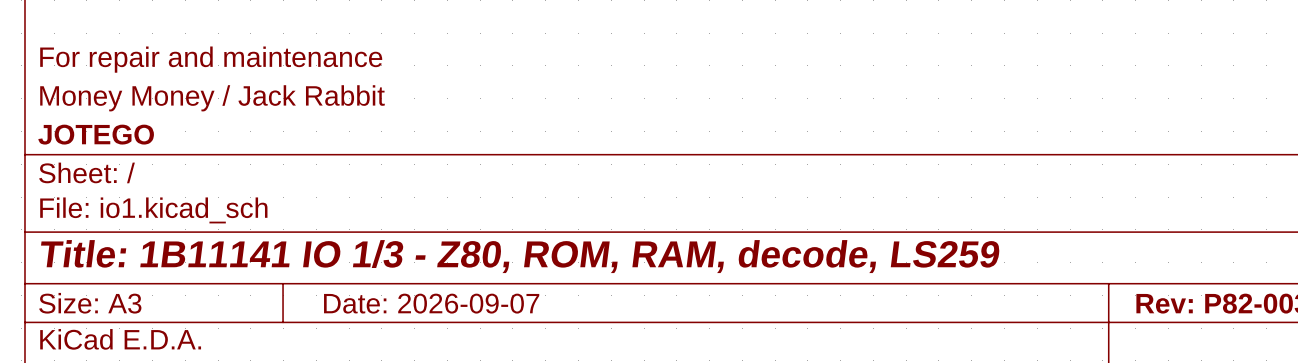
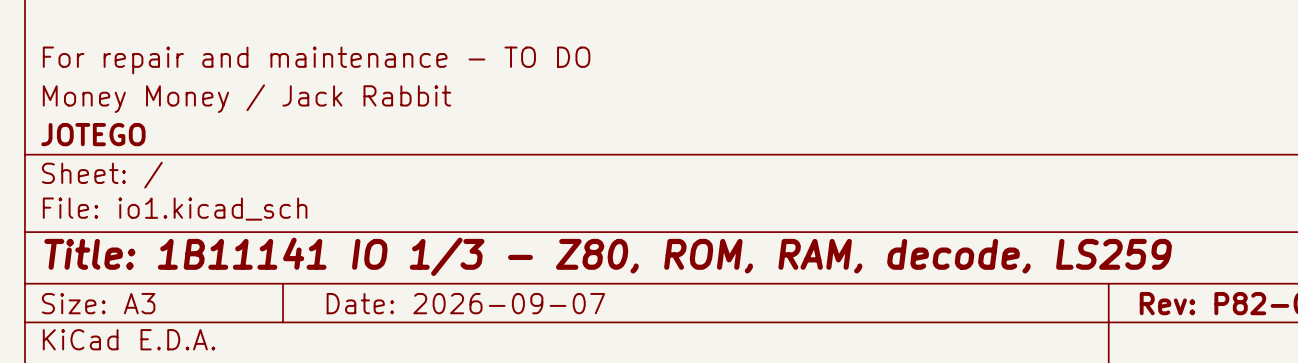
title block: For repair and maintenance (211, 59) -> For repair and maintenance - TO DO (316, 60)

